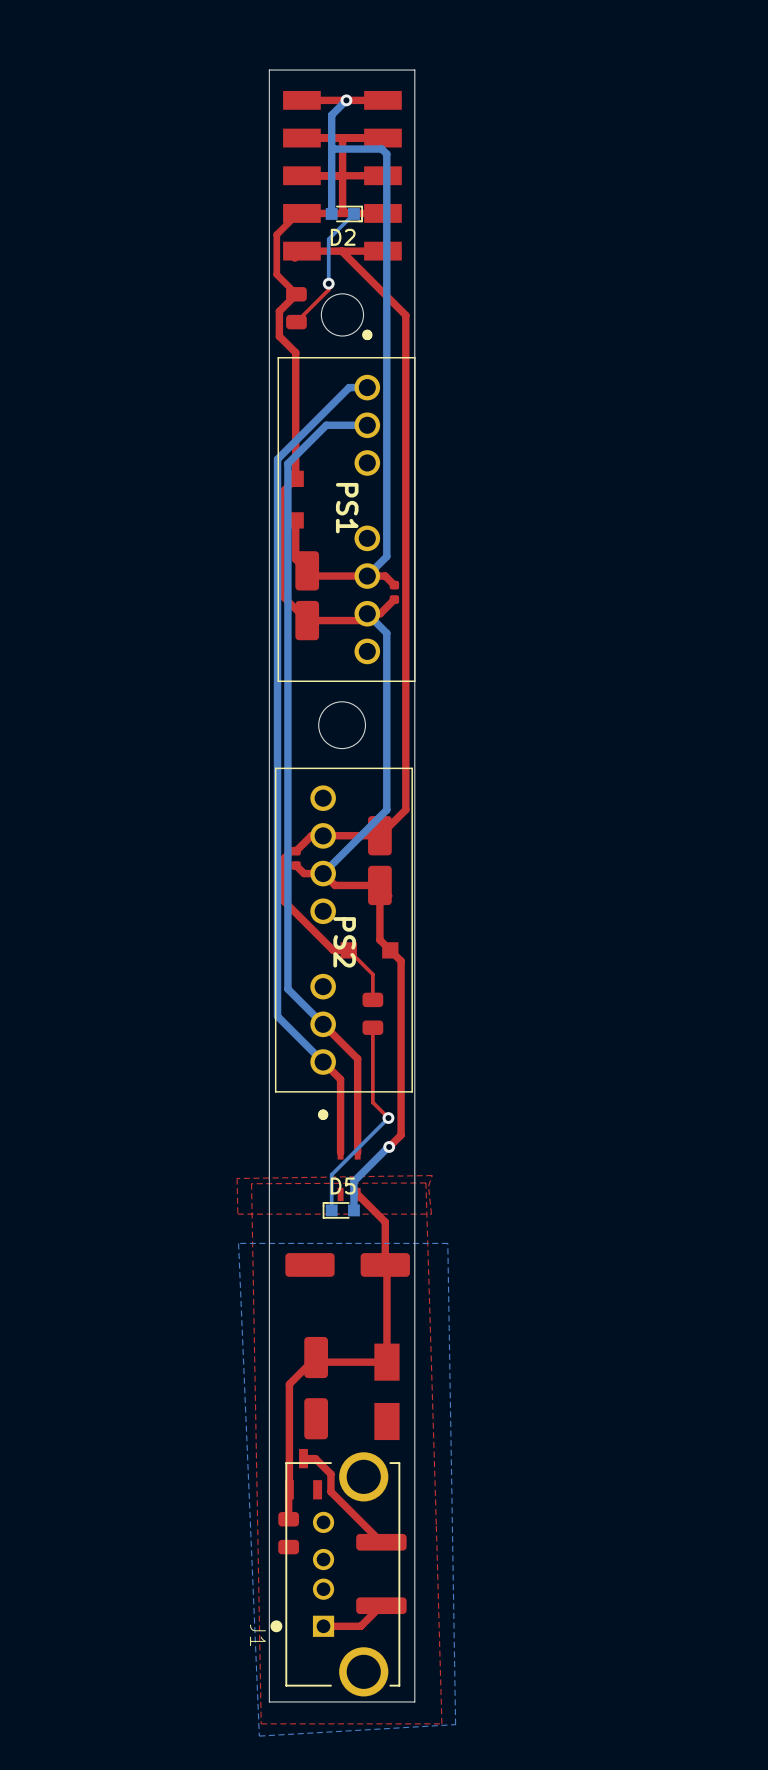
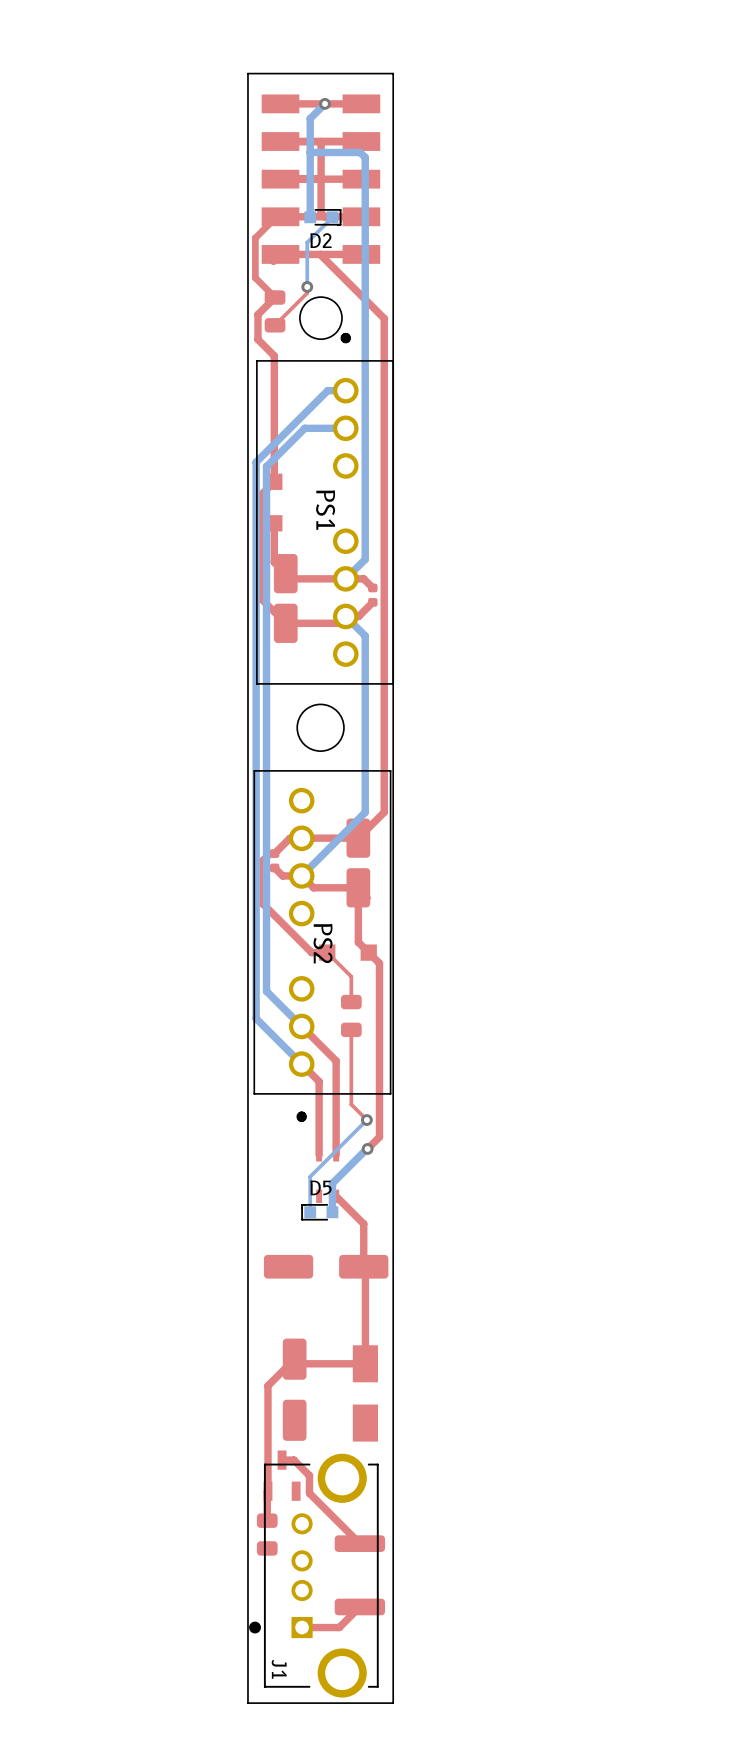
top zone outline: (432, 1175) (428, 1186) (431, 1214) (237, 1214) (237, 1178) (432, 1175) -> none
top zone outline: (425, 1182) (441, 1723) (261, 1723) (251, 1183) (425, 1182) -> none
bottom zone outline: (447, 1243) (455, 1724) (259, 1736) (238, 1243) (447, 1243) -> none
J1 name position: J1 (258, 1635) -> J1 (279, 1669)

